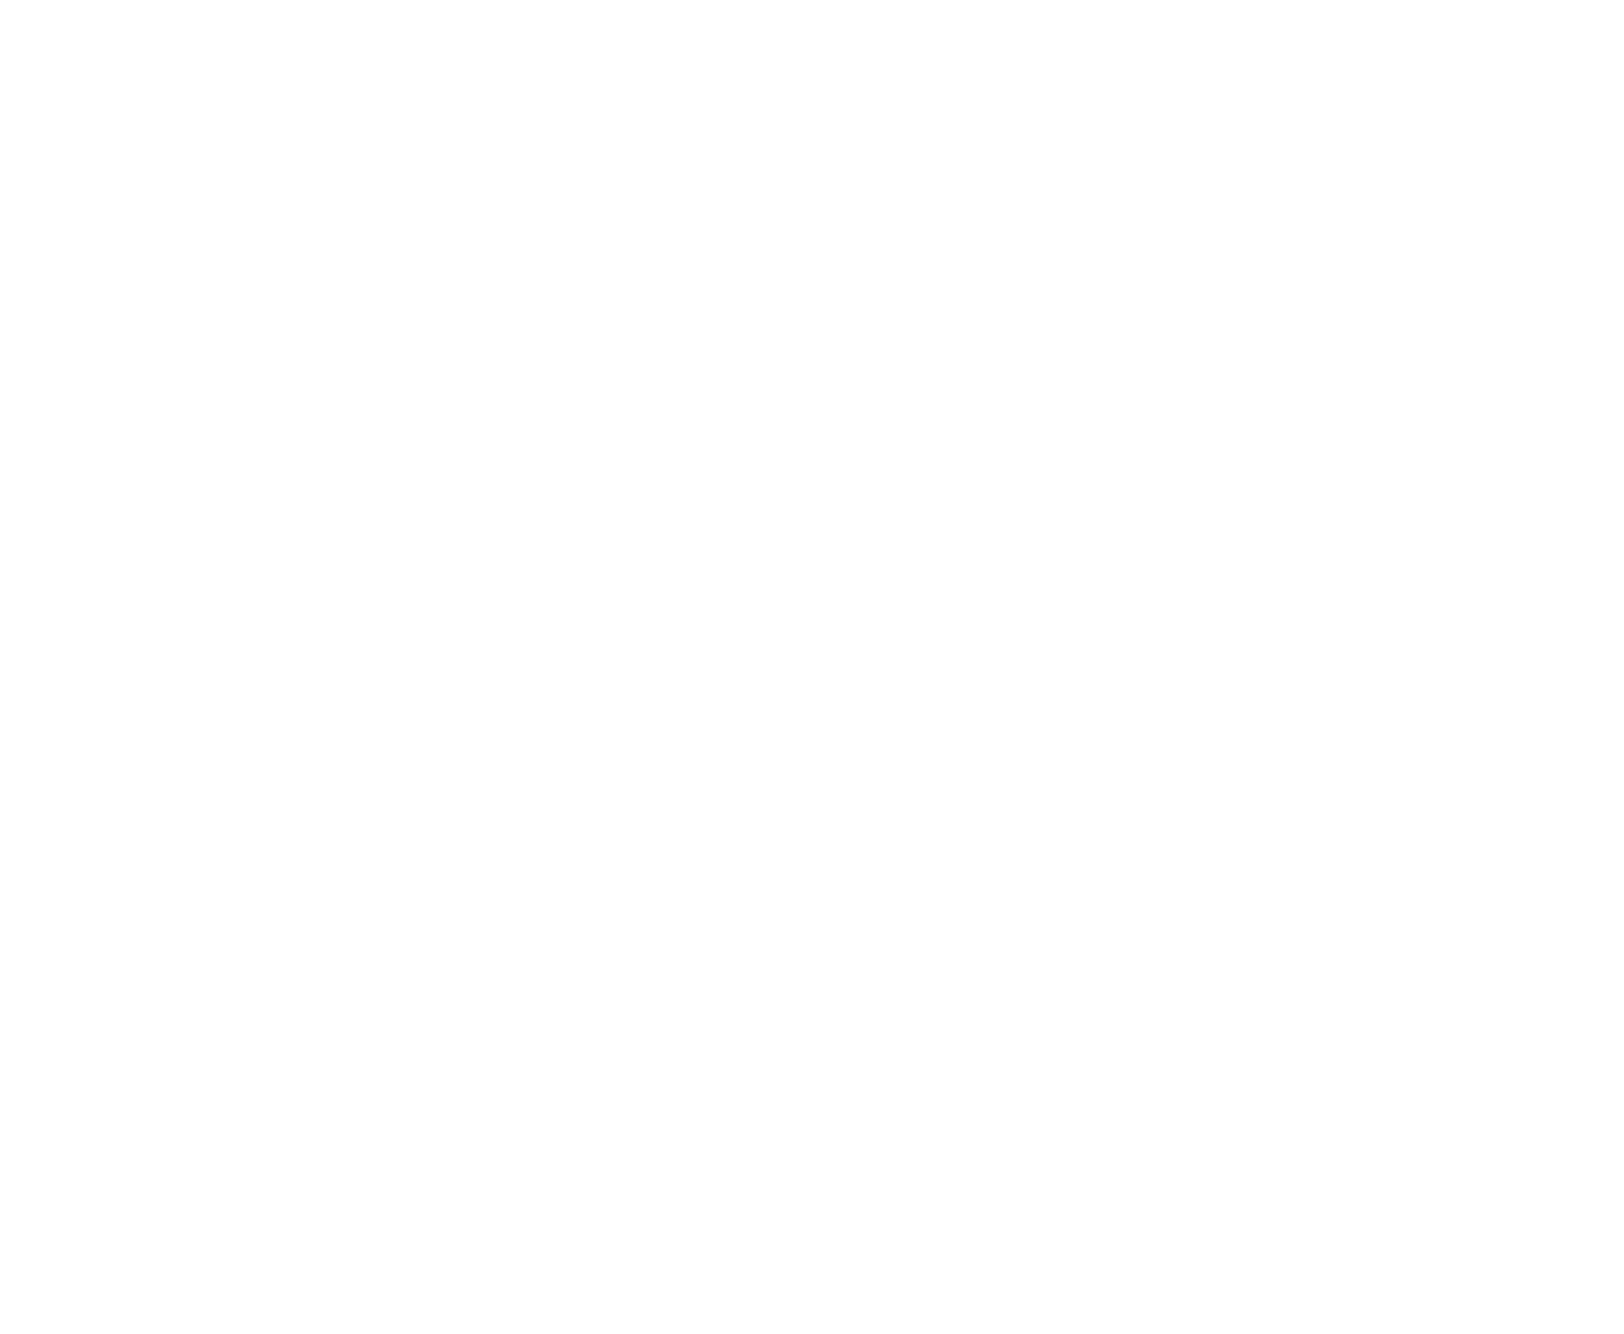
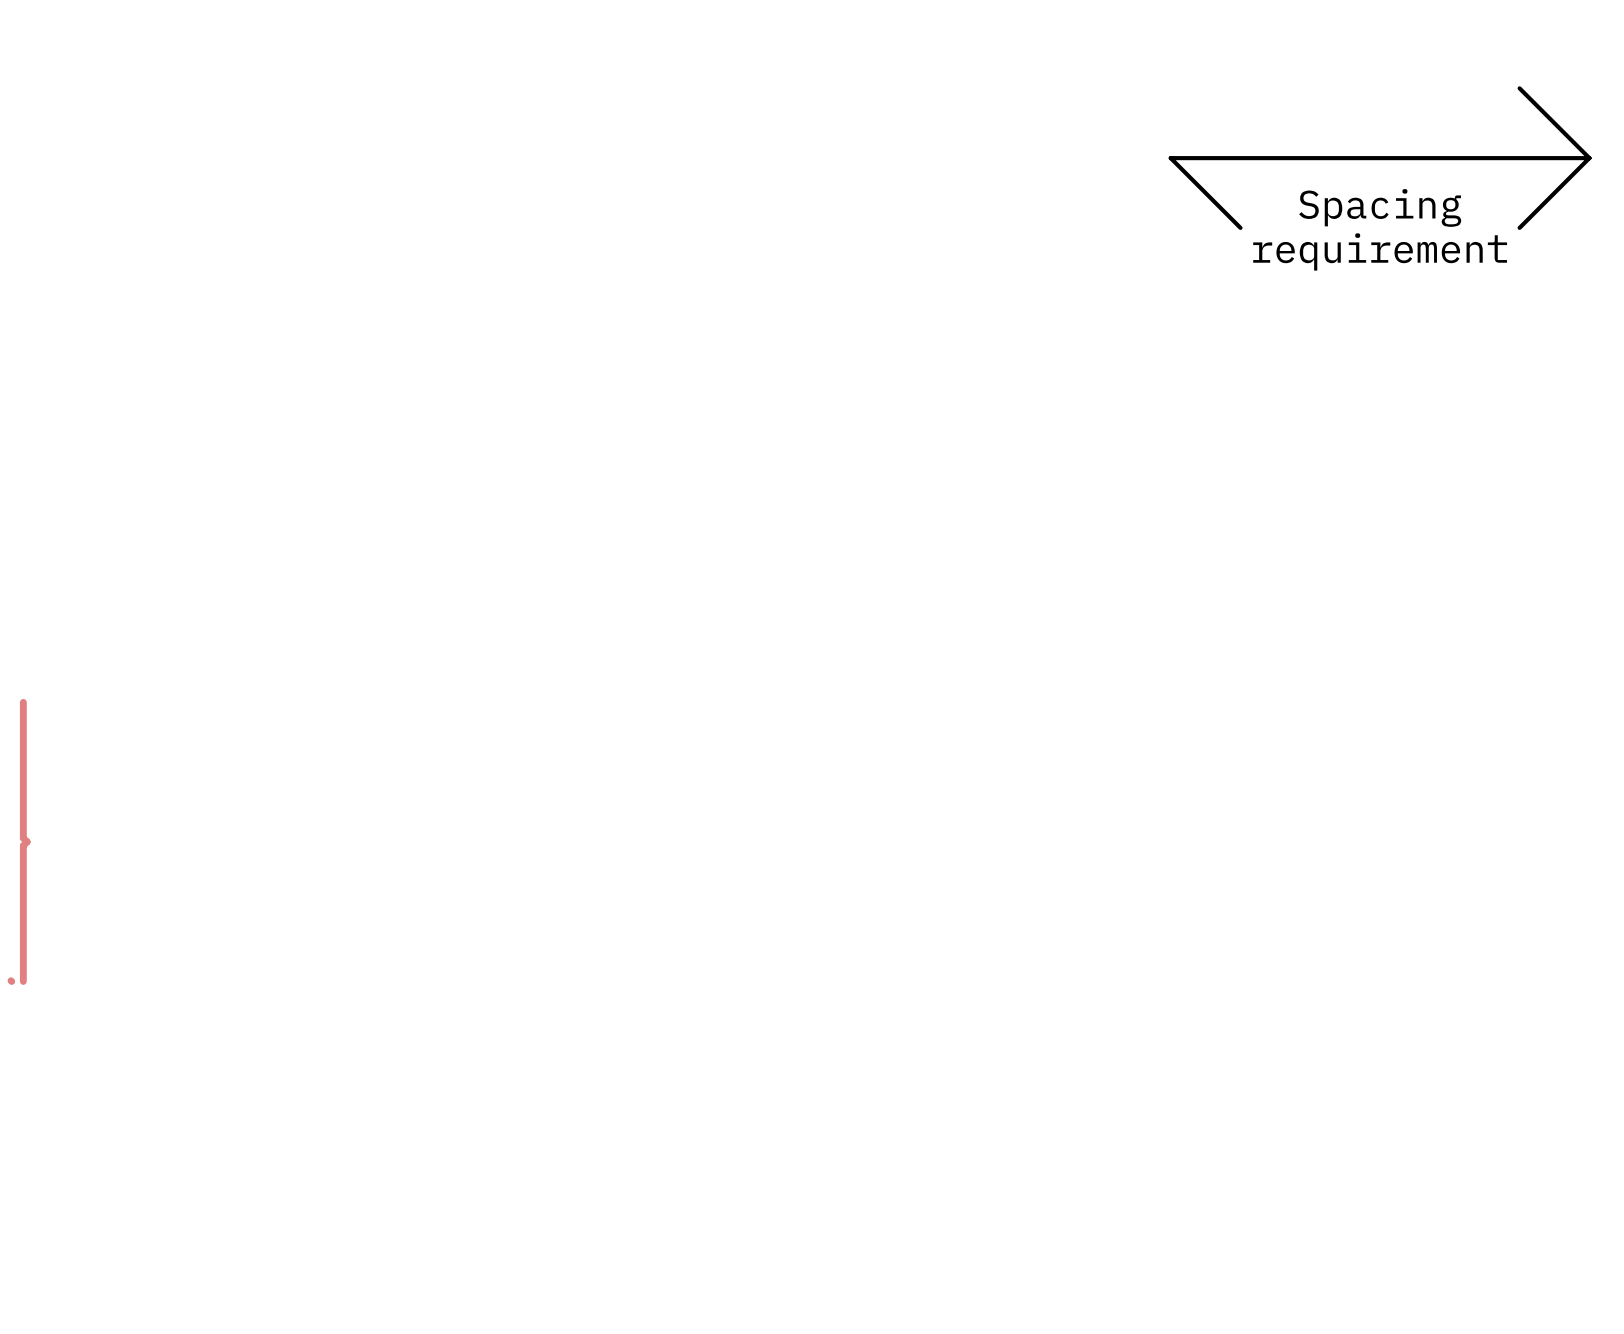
line: none -> (1519, 88) (1589, 158)
line: none -> (1589, 158) (1519, 227)
line: none -> (1589, 158) (1170, 158) (1240, 227)
text: none -> Spacing (1380, 207)
text: none -> requirement (1380, 251)
top track: none -> (23, 702) (23, 838) (27, 841) (23, 845) (23, 981)
top track: none -> (11, 980) (11, 981)

